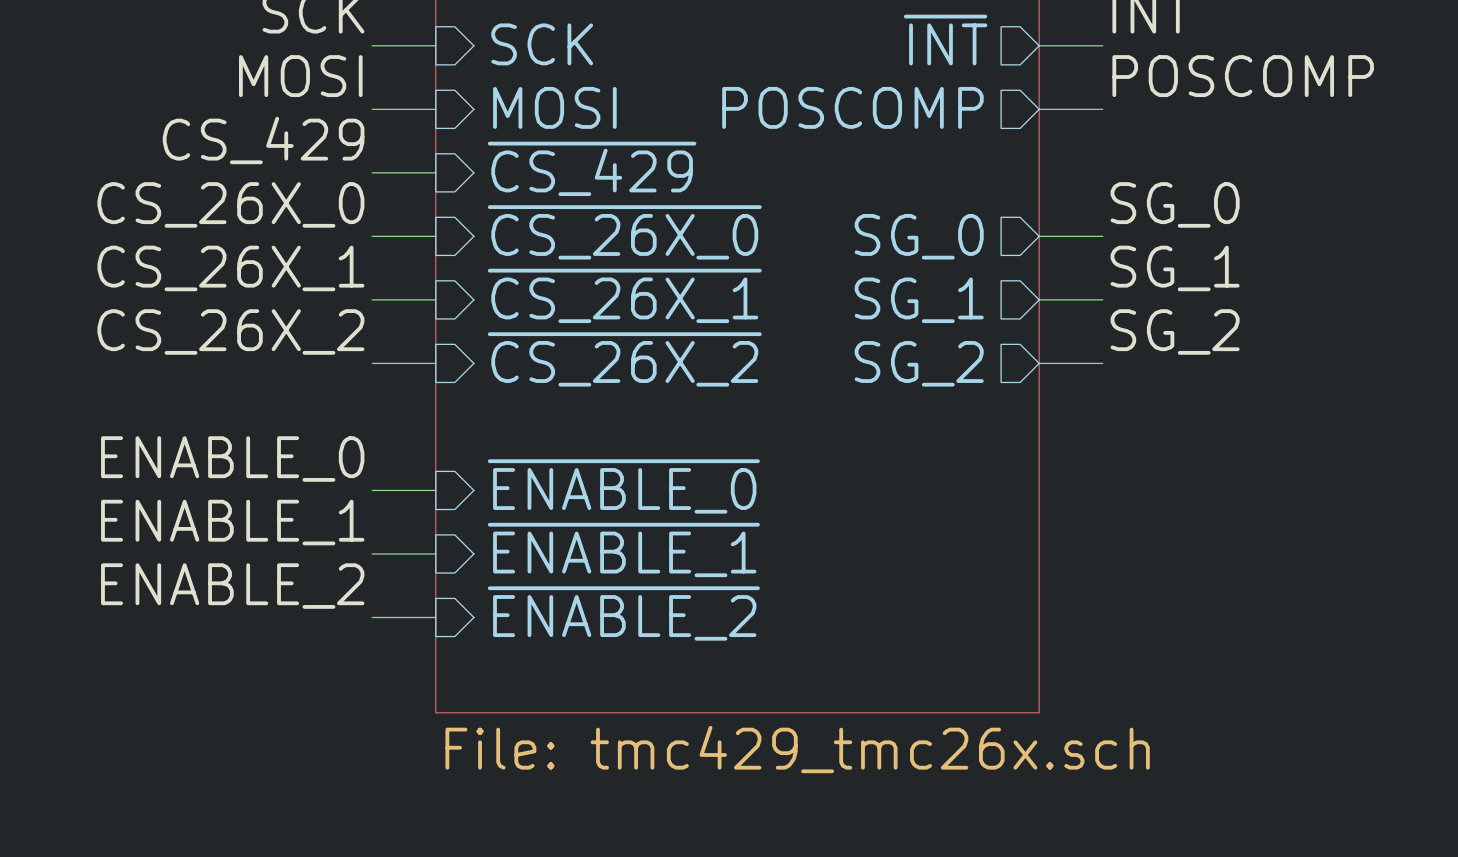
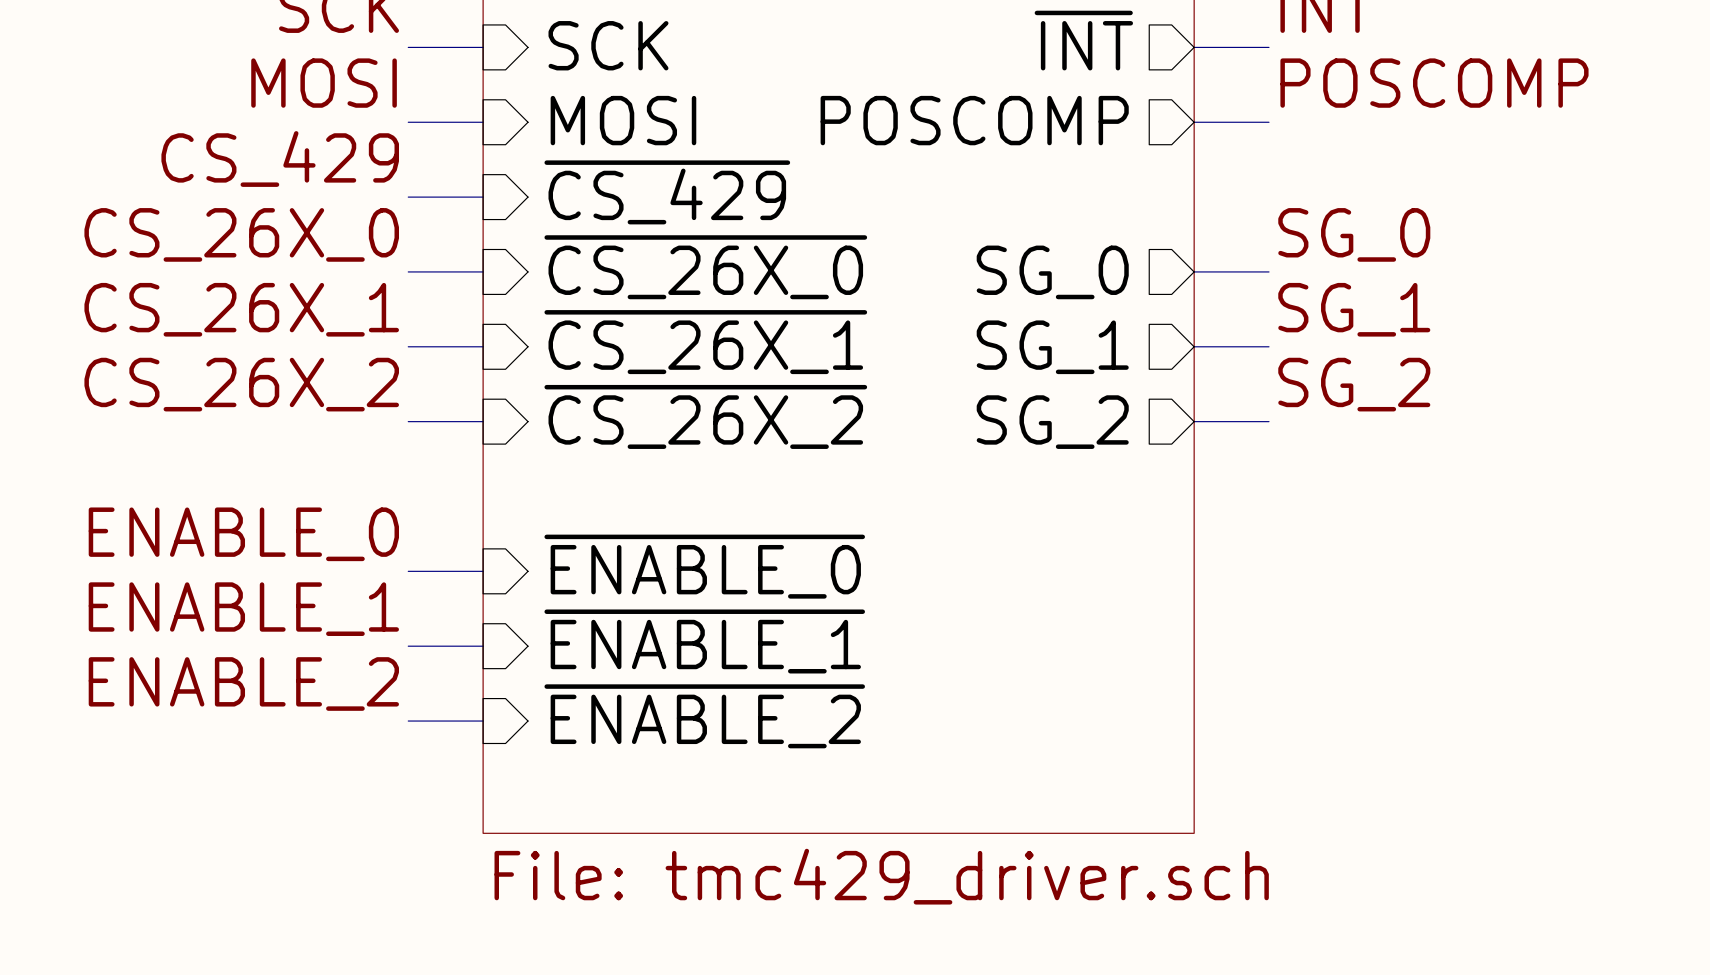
sheet value: File: tmc429_tmc26x.sch (797, 749) -> File: tmc429_driver.sch (881, 876)

